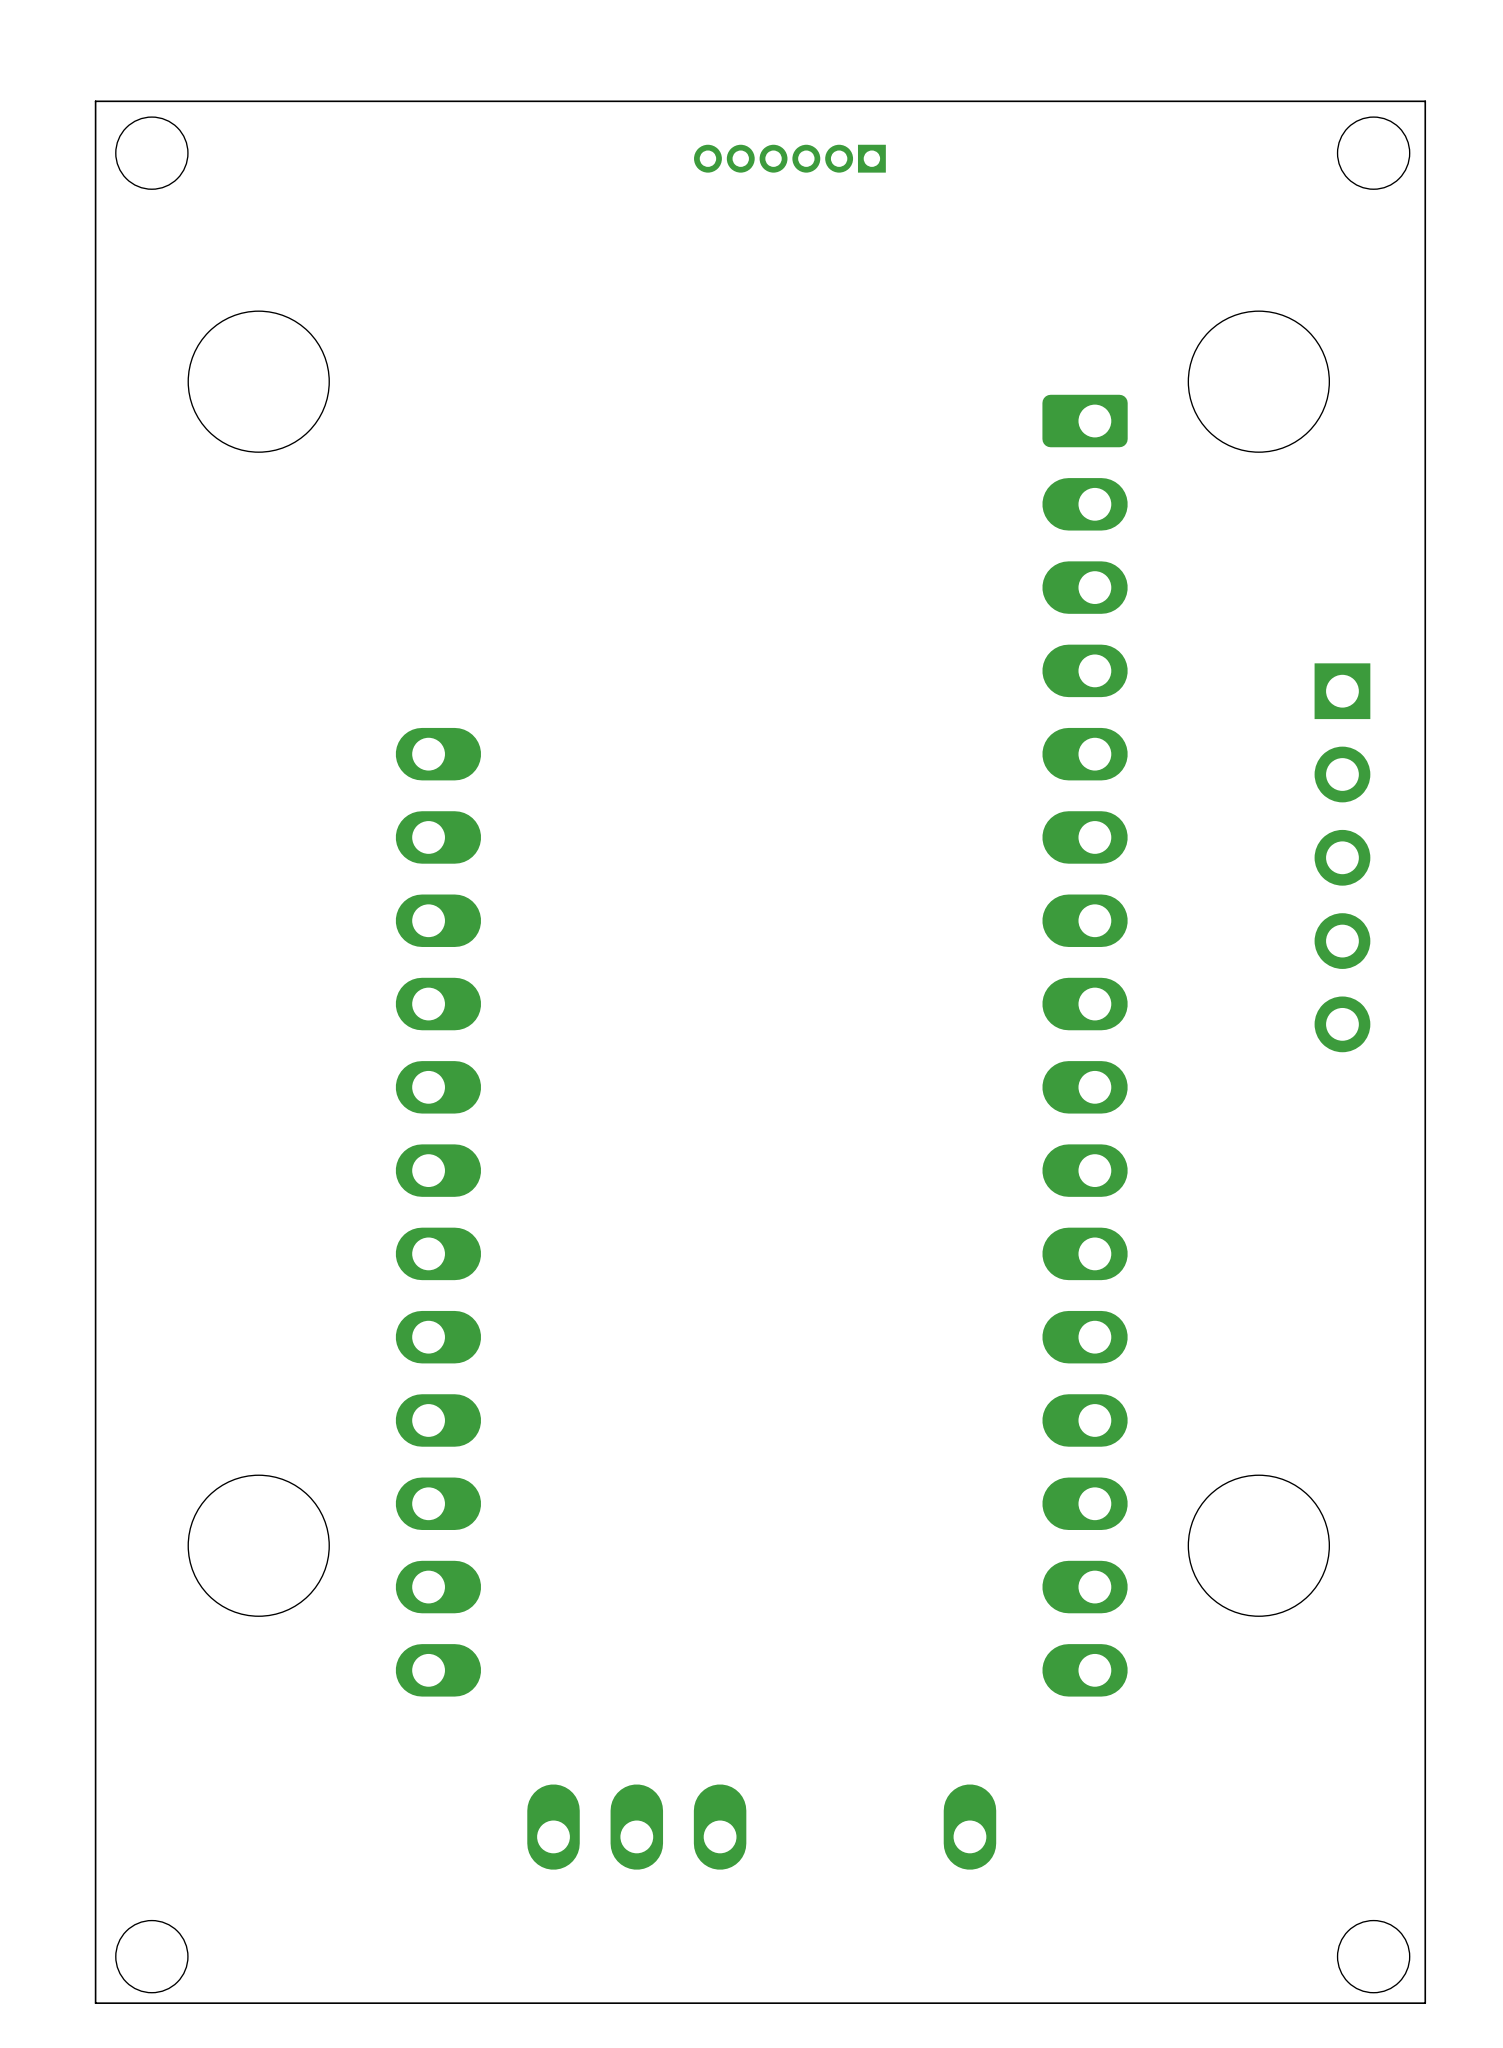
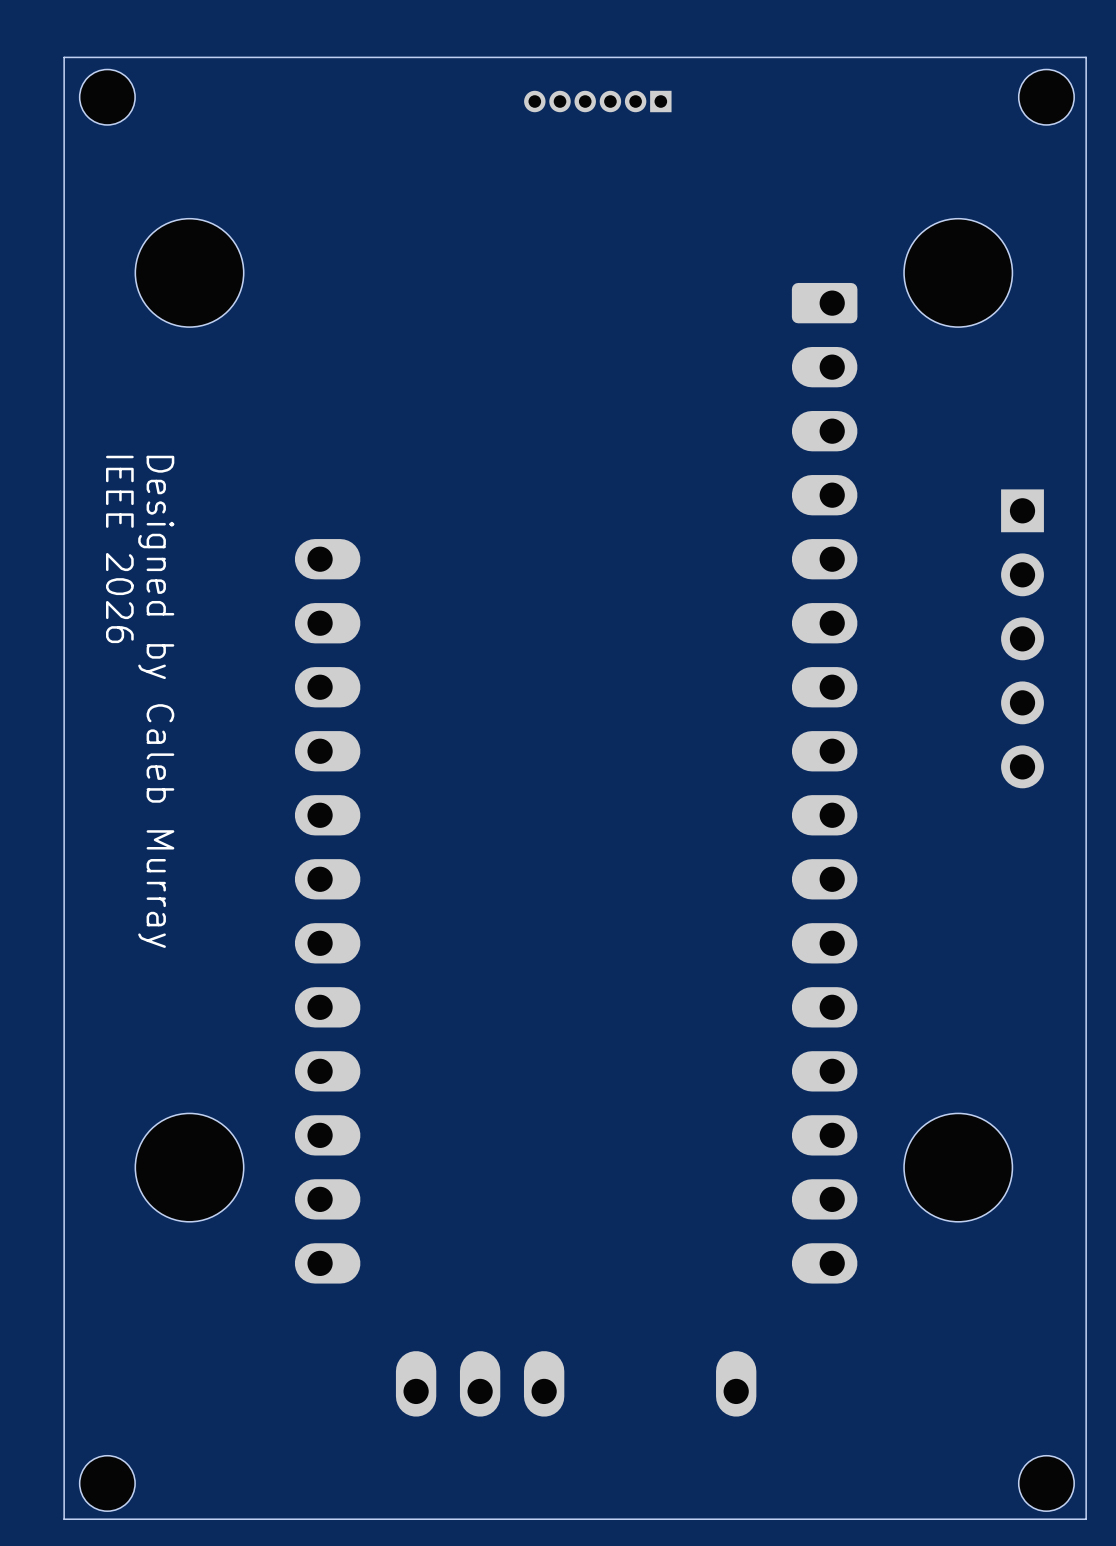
text: none -> IEEE 2026 (119, 549)
text: none -> Designed by Caleb Murray (156, 701)

